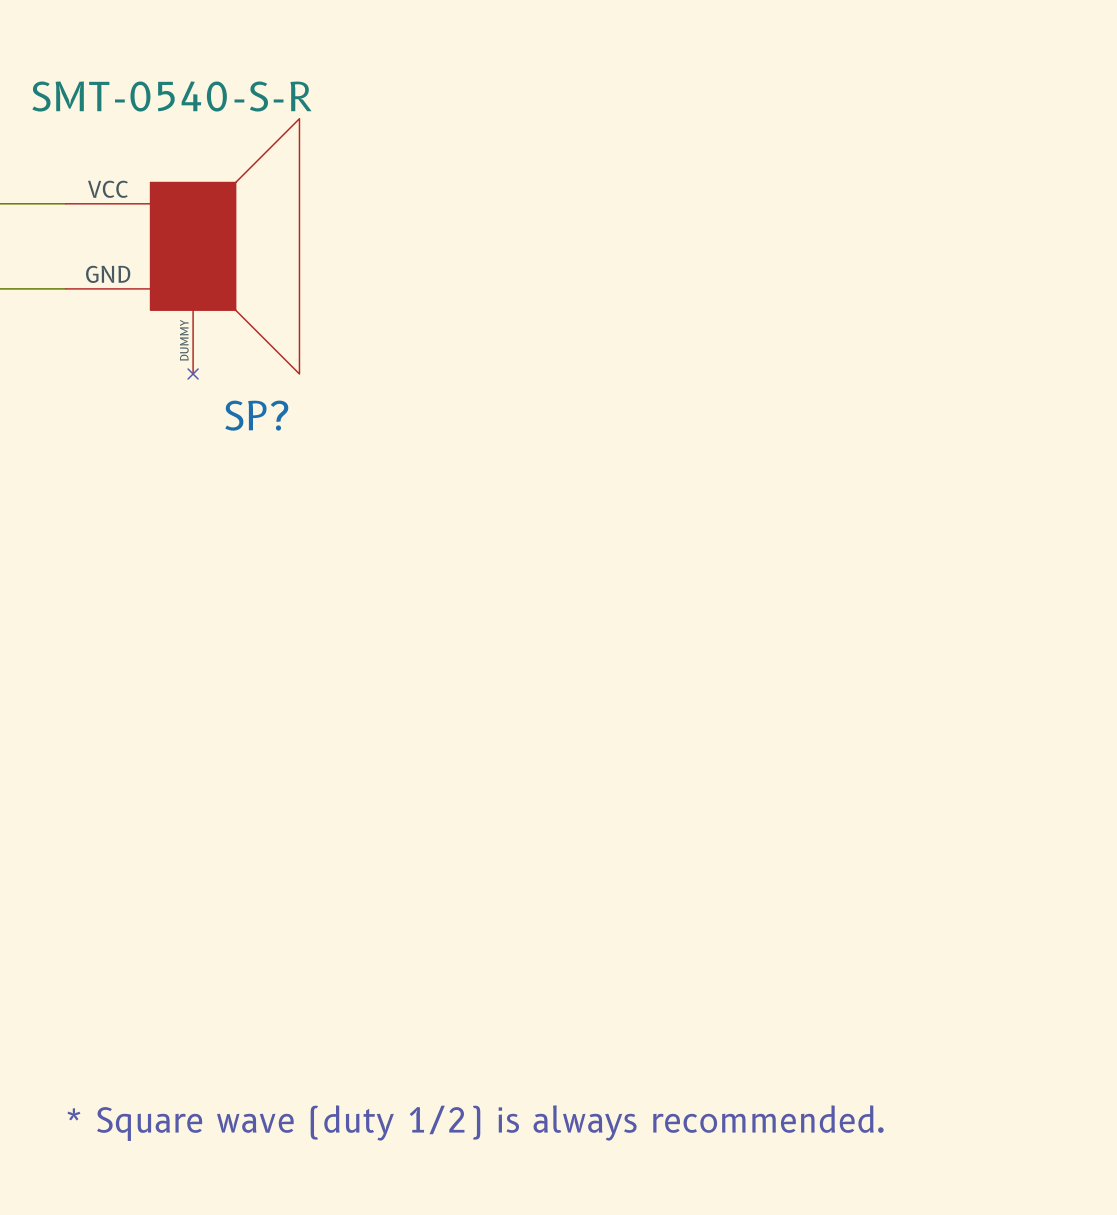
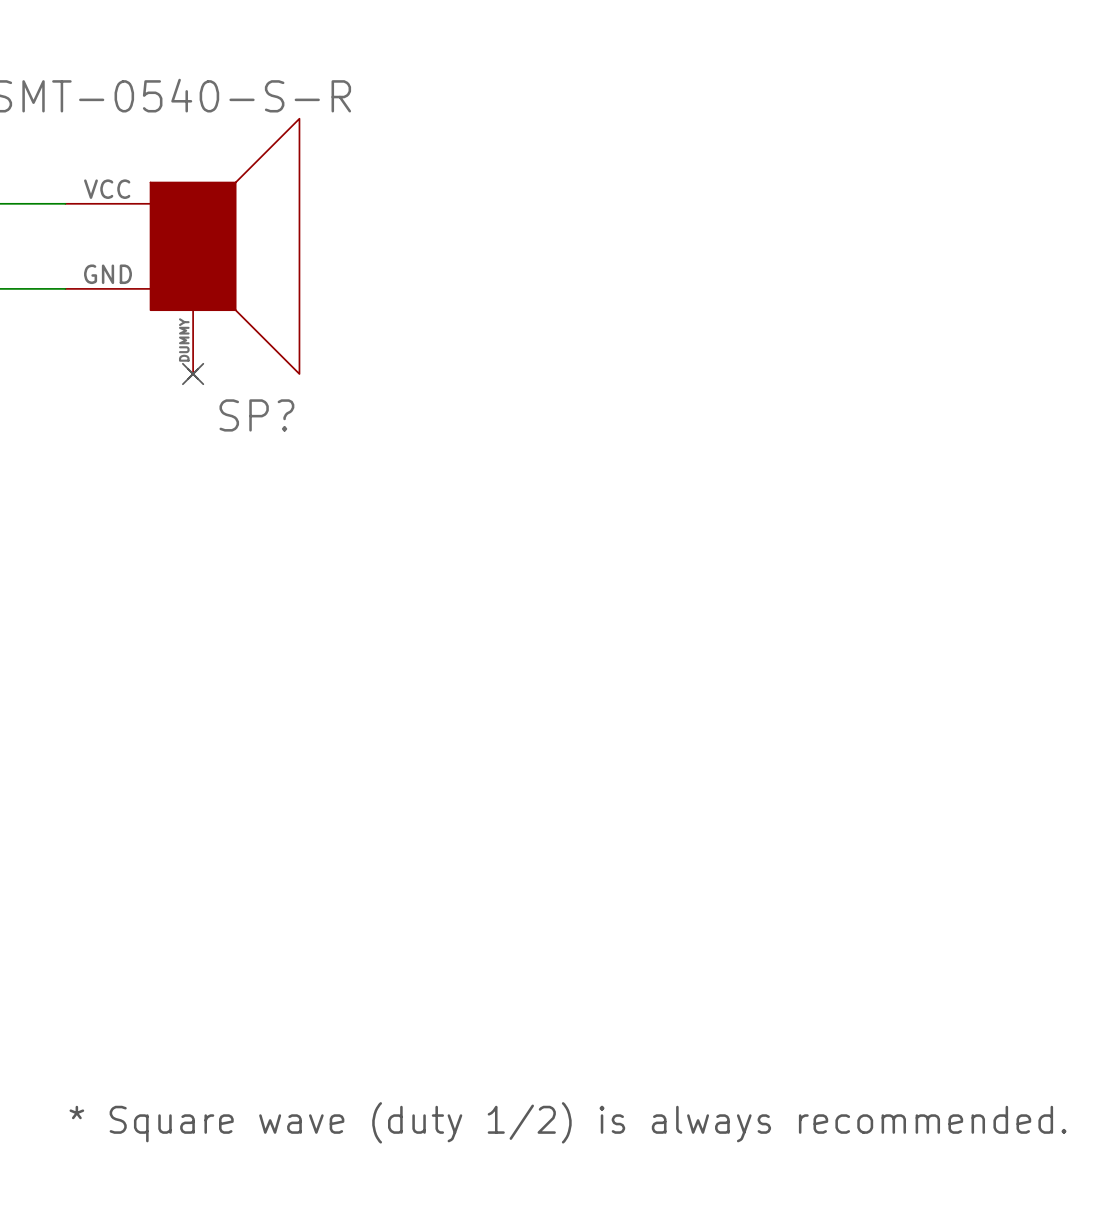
no-connect mark: none -> (193, 374)

